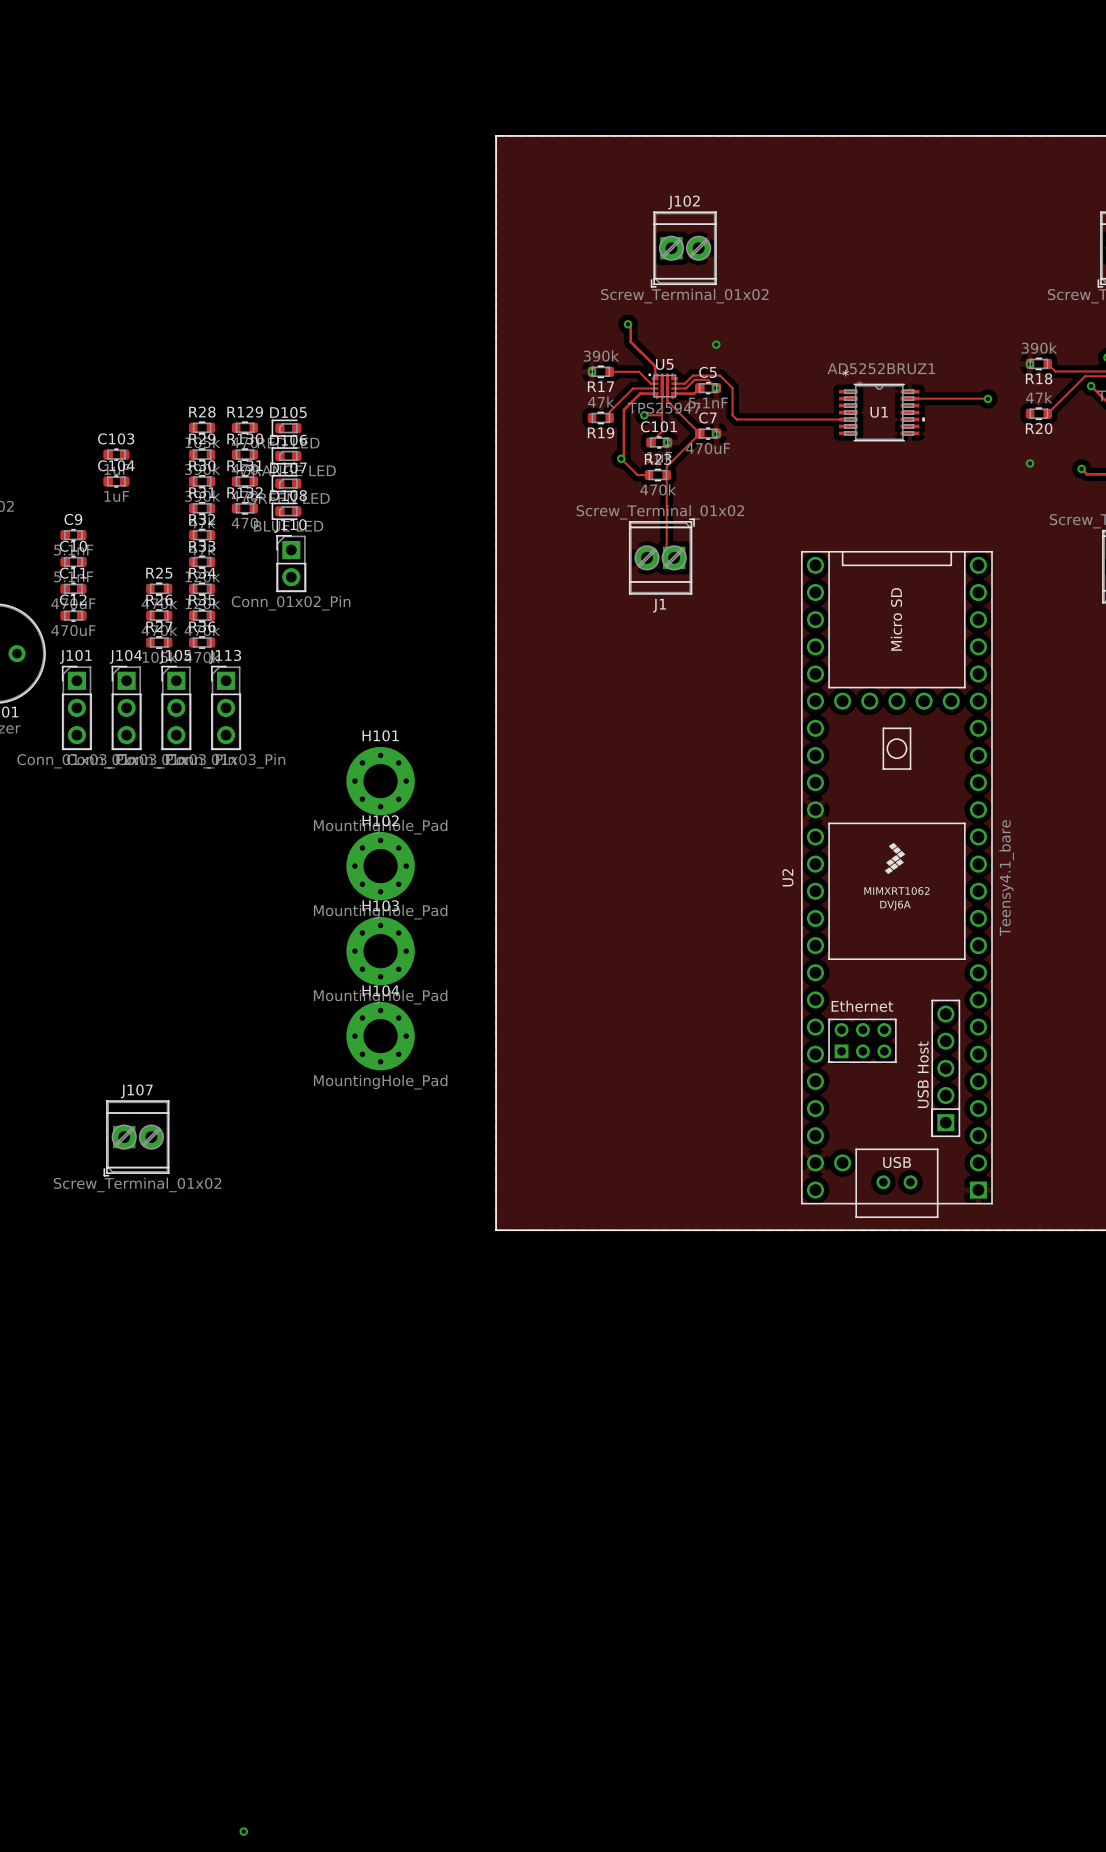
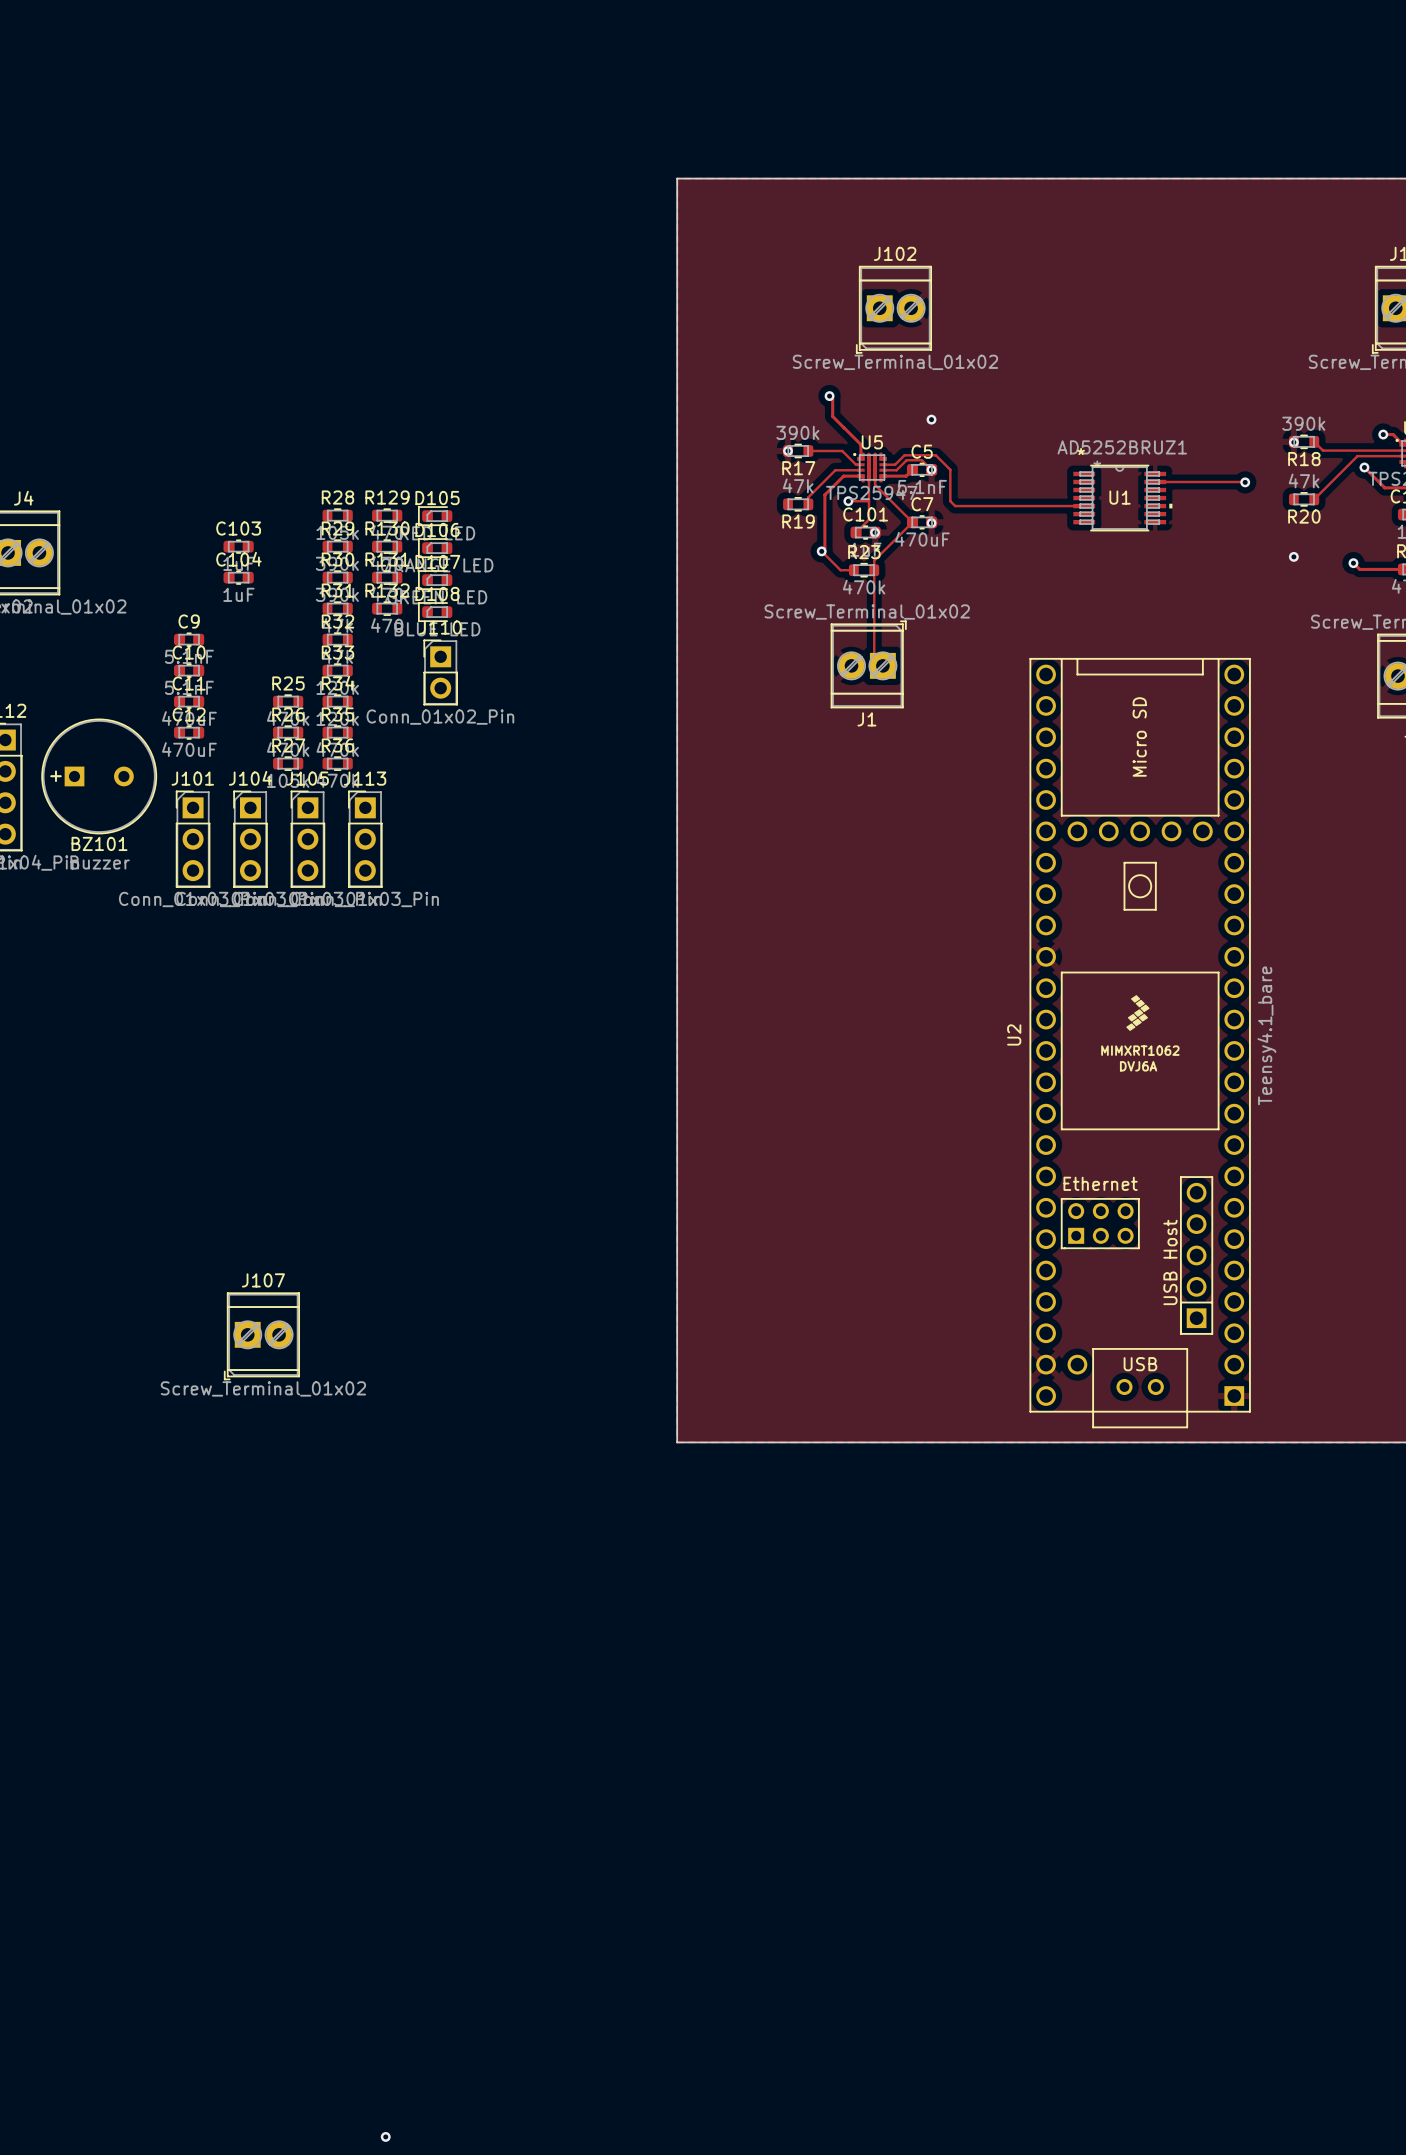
H101: MountingHole_Pad (380, 781) -> none
H102: MountingHole_Pad (380, 866) -> none
H103: MountingHole_Pad (380, 951) -> none
H104: MountingHole_Pad (380, 1036) -> none

